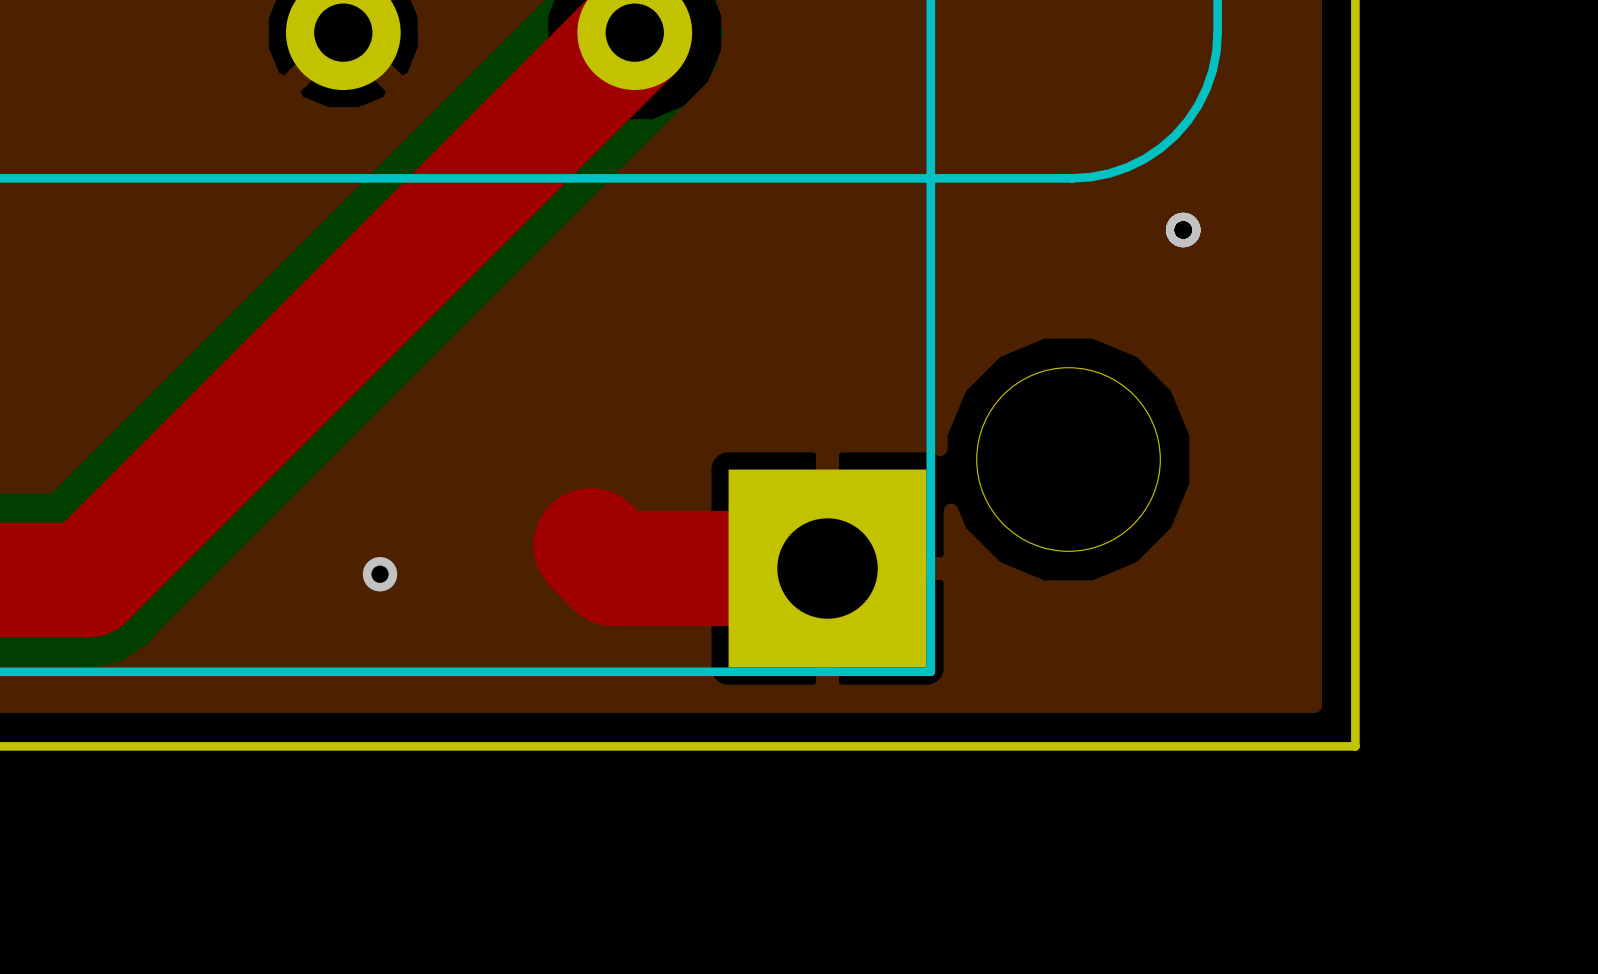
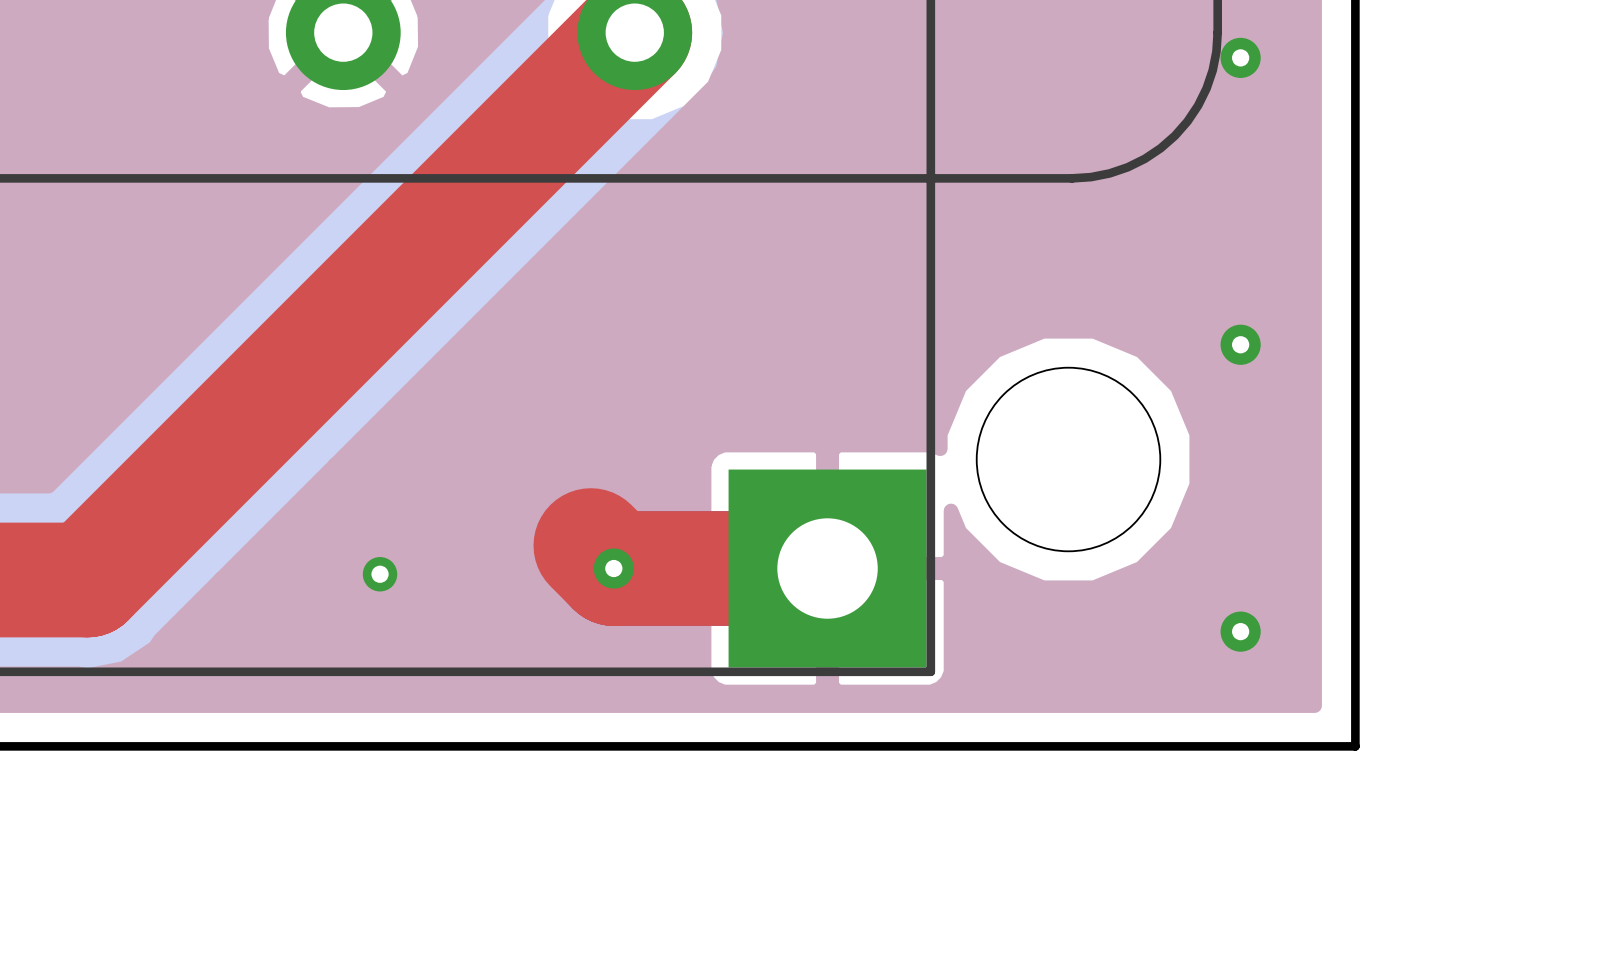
via: none -> (1240, 57)
via: (1183, 230) -> none
via: none -> (1240, 344)
via: none -> (613, 568)
via: none -> (1240, 631)

